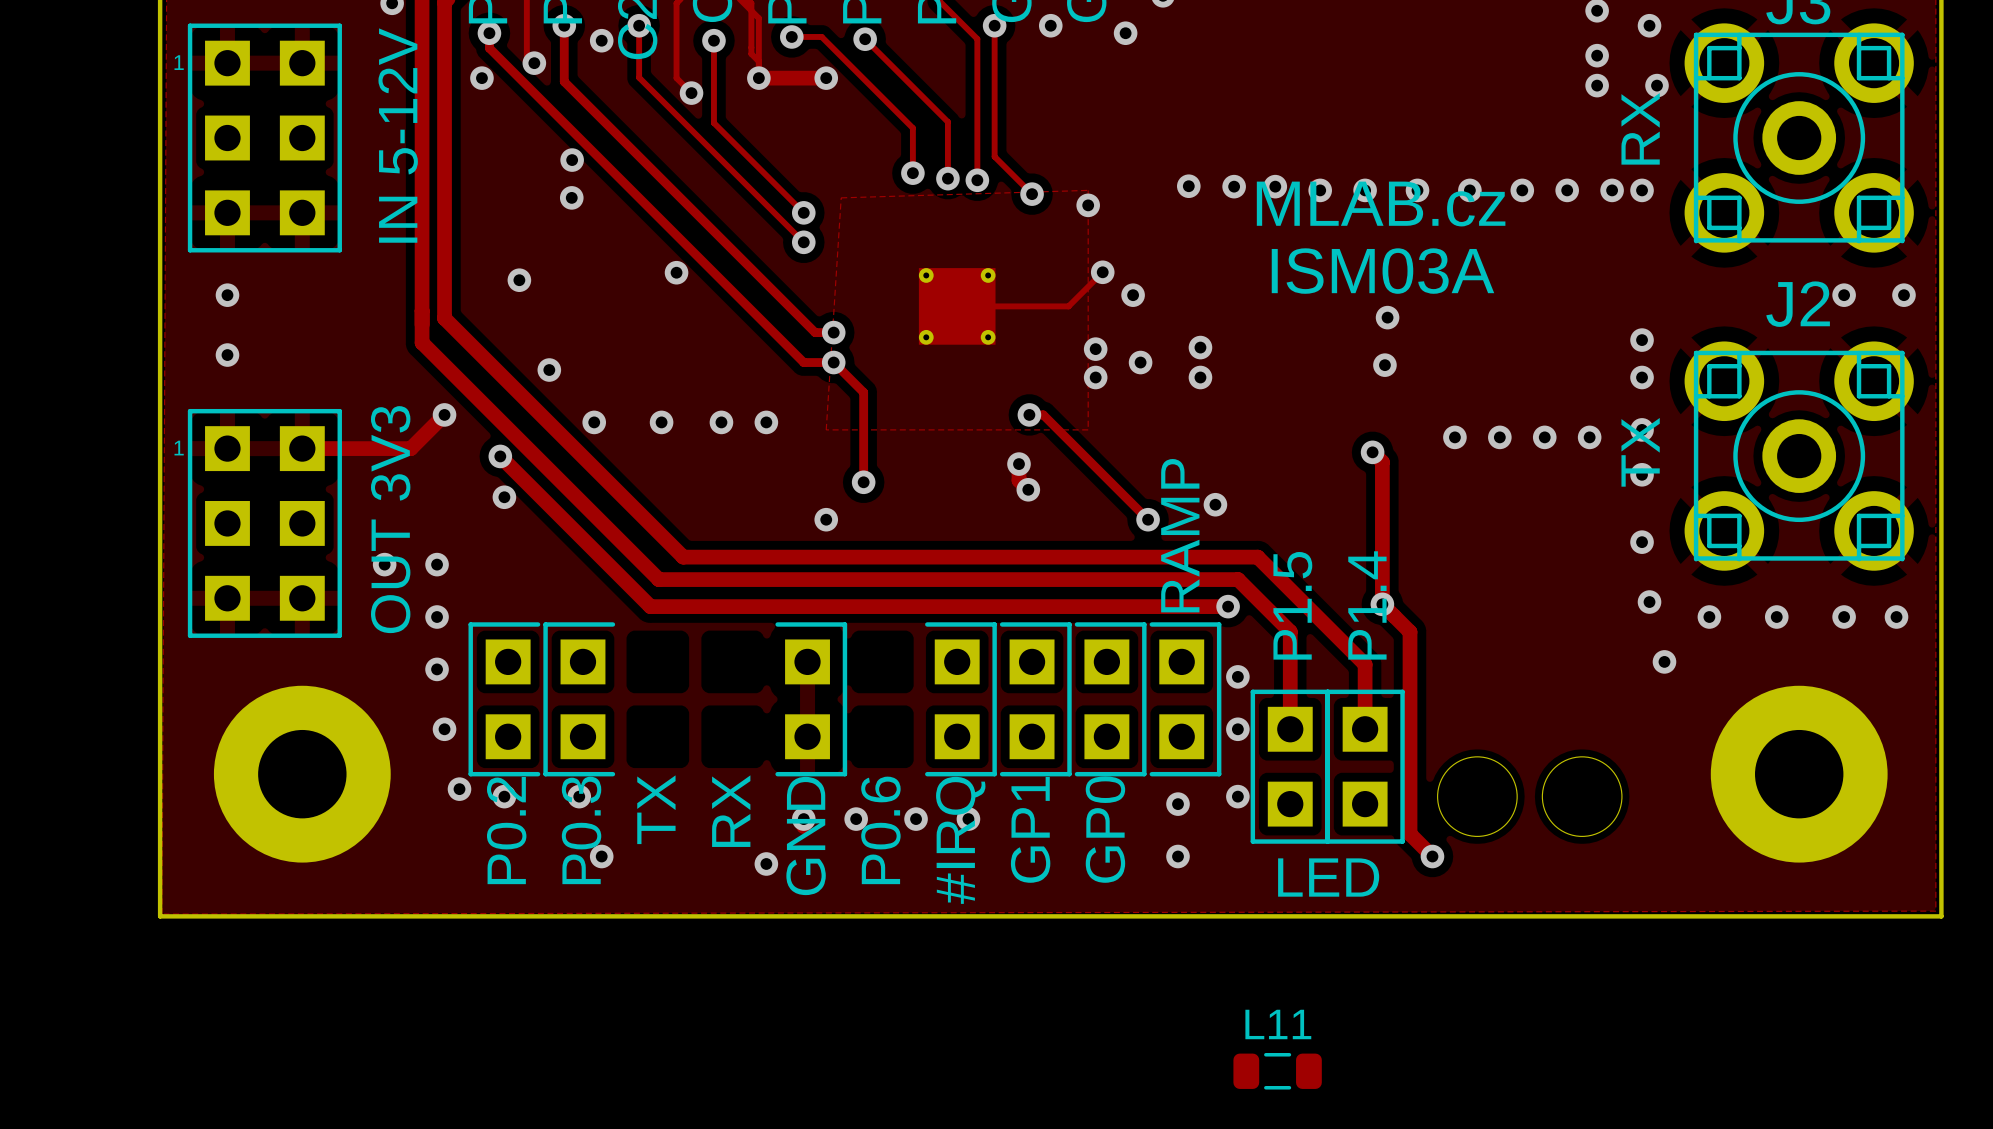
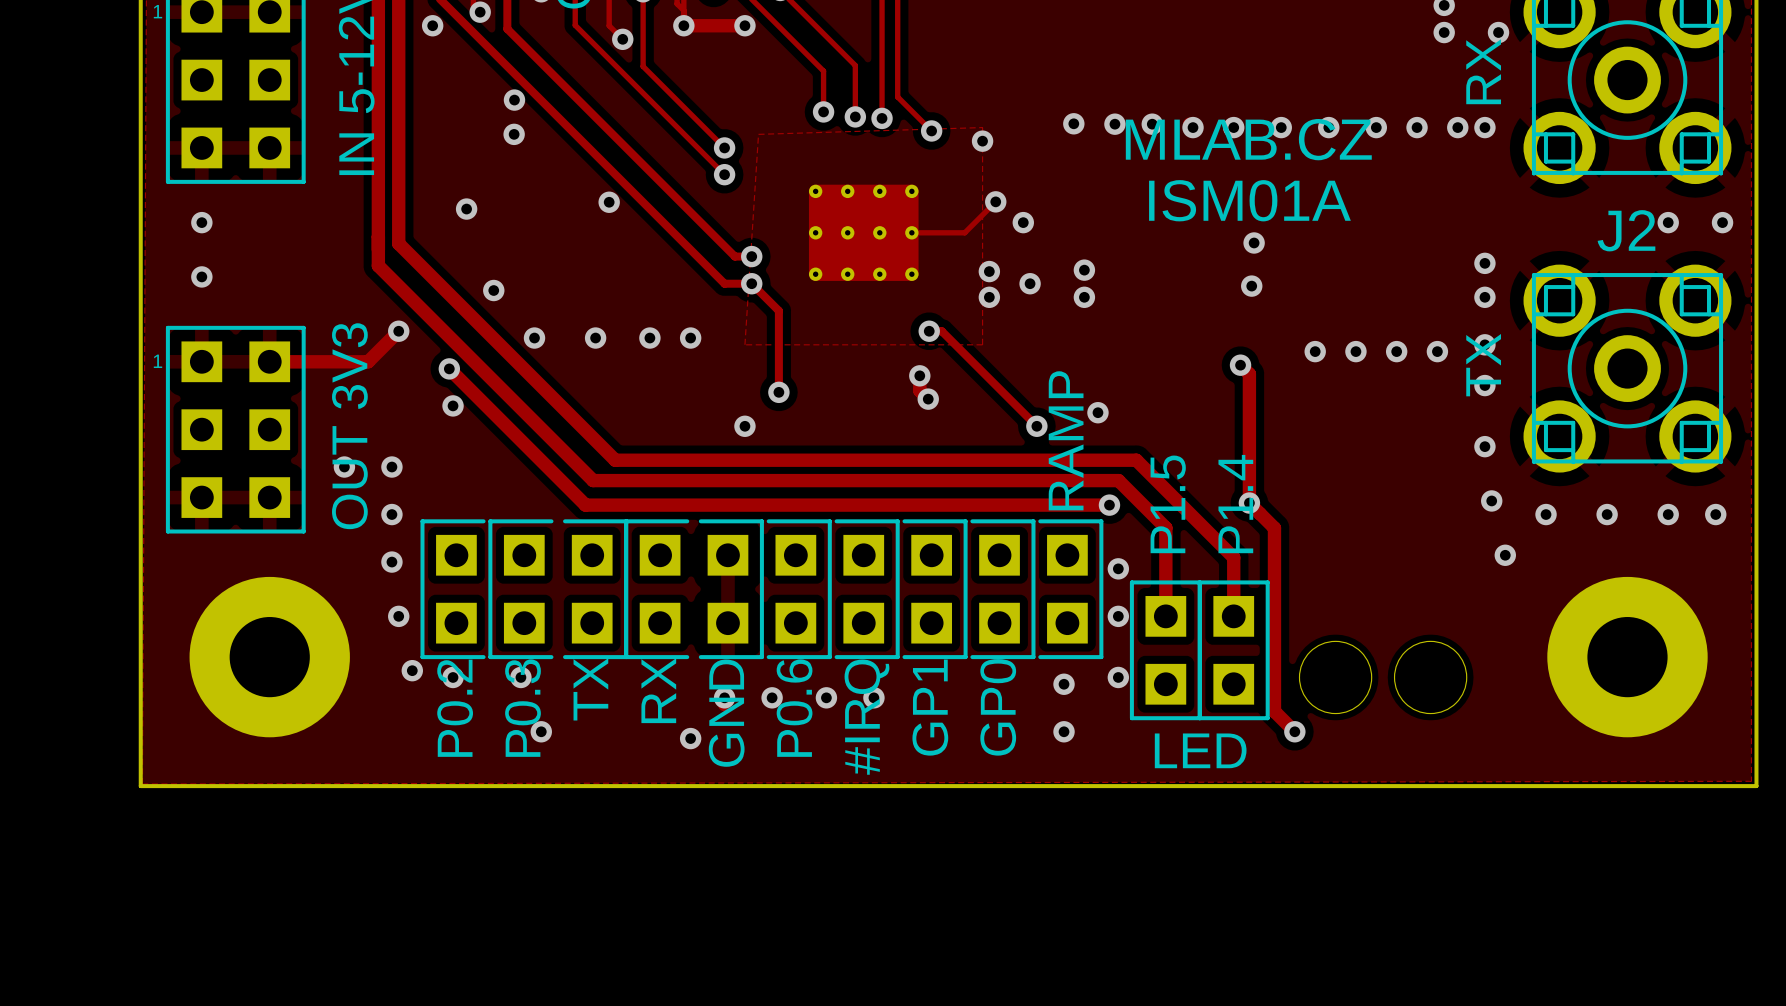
text: MLAB.cz (1381, 204) -> MLAB.CZ (1248, 139)
part footprint: [918, 268, 996, 345] -> [808, 184, 919, 281]
text: ISM03A (1382, 271) -> ISM01A (1249, 200)
part: none -> (595, 589)
part: none -> (656, 589)
part: none -> (799, 589)
L11: (1277, 1071) -> none

